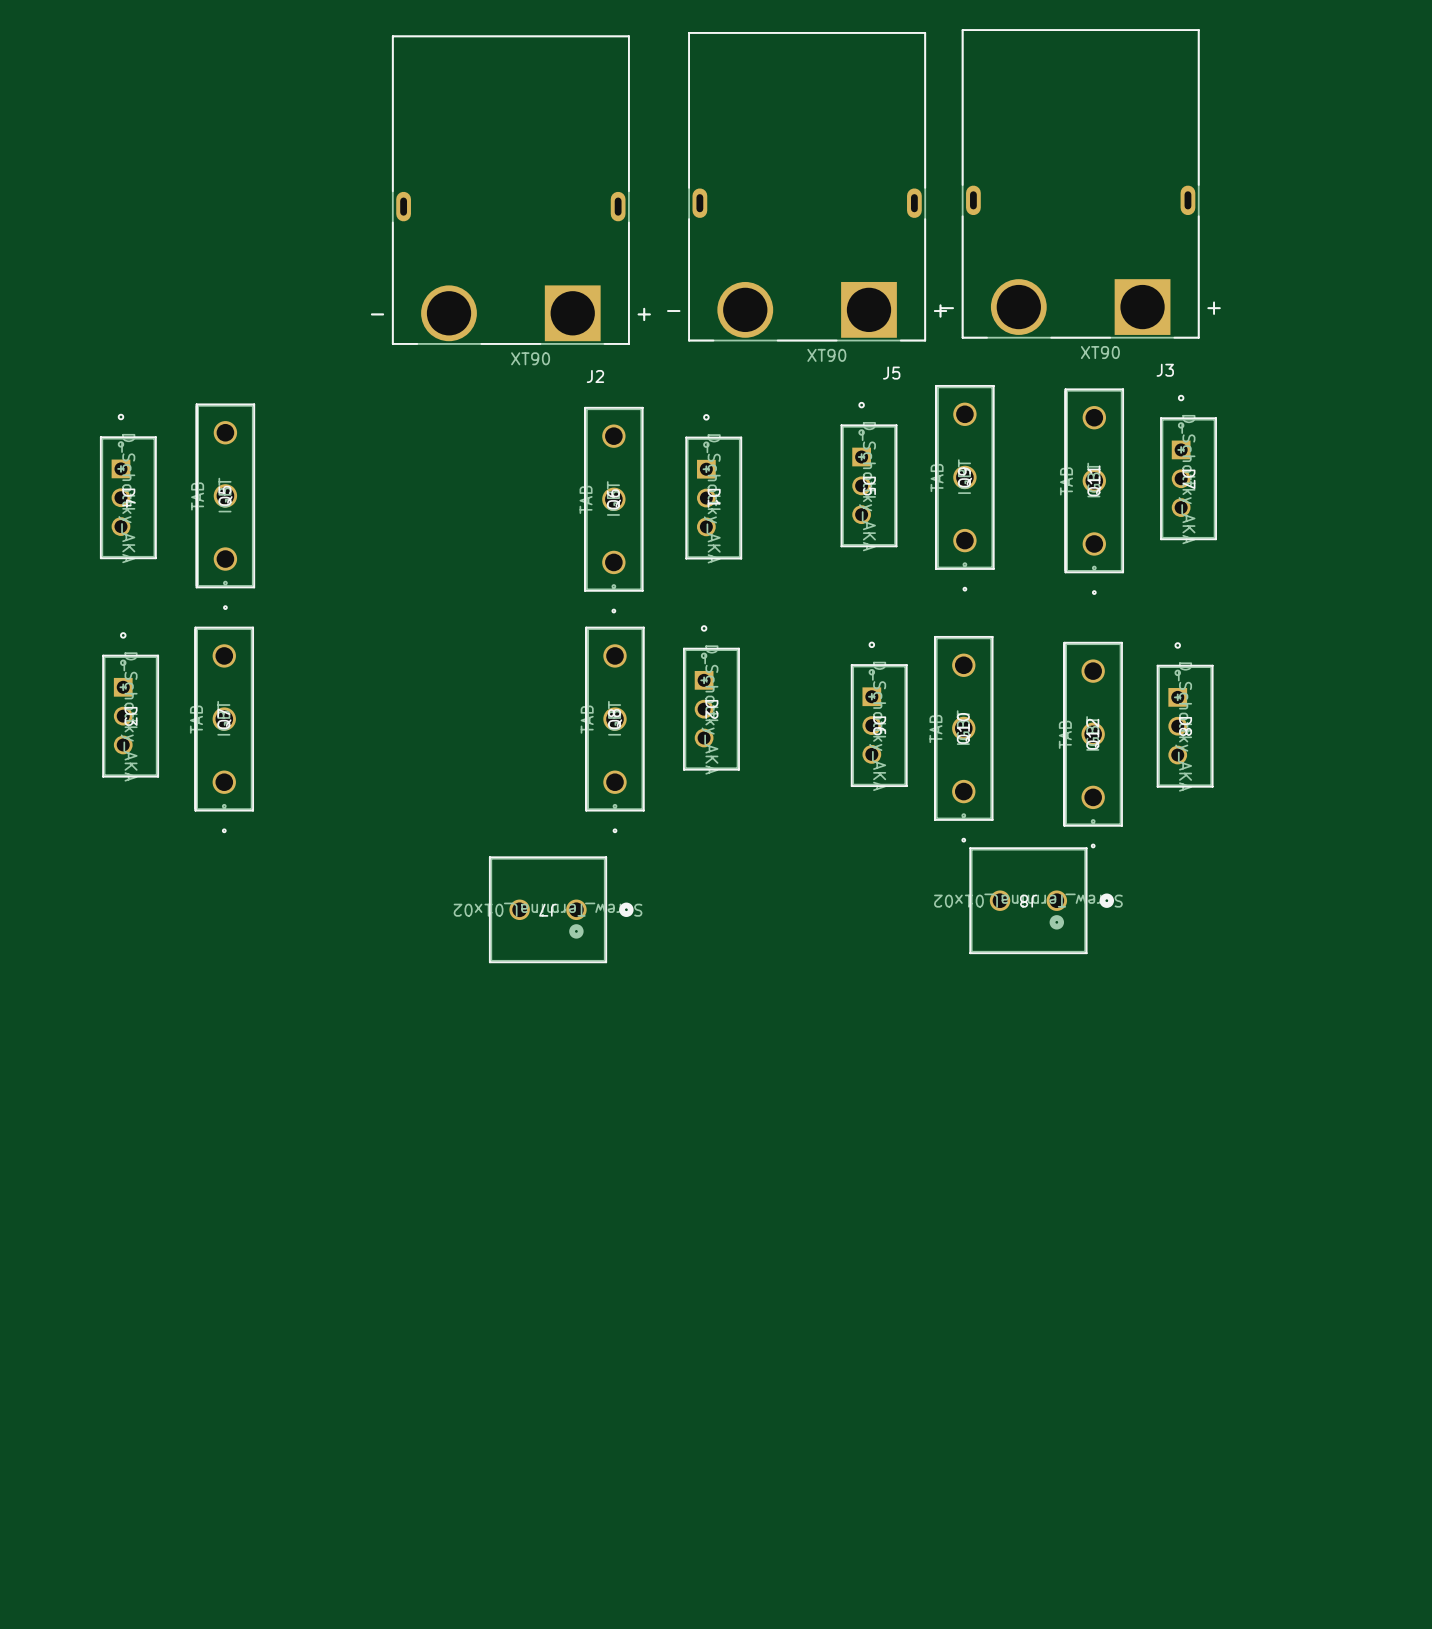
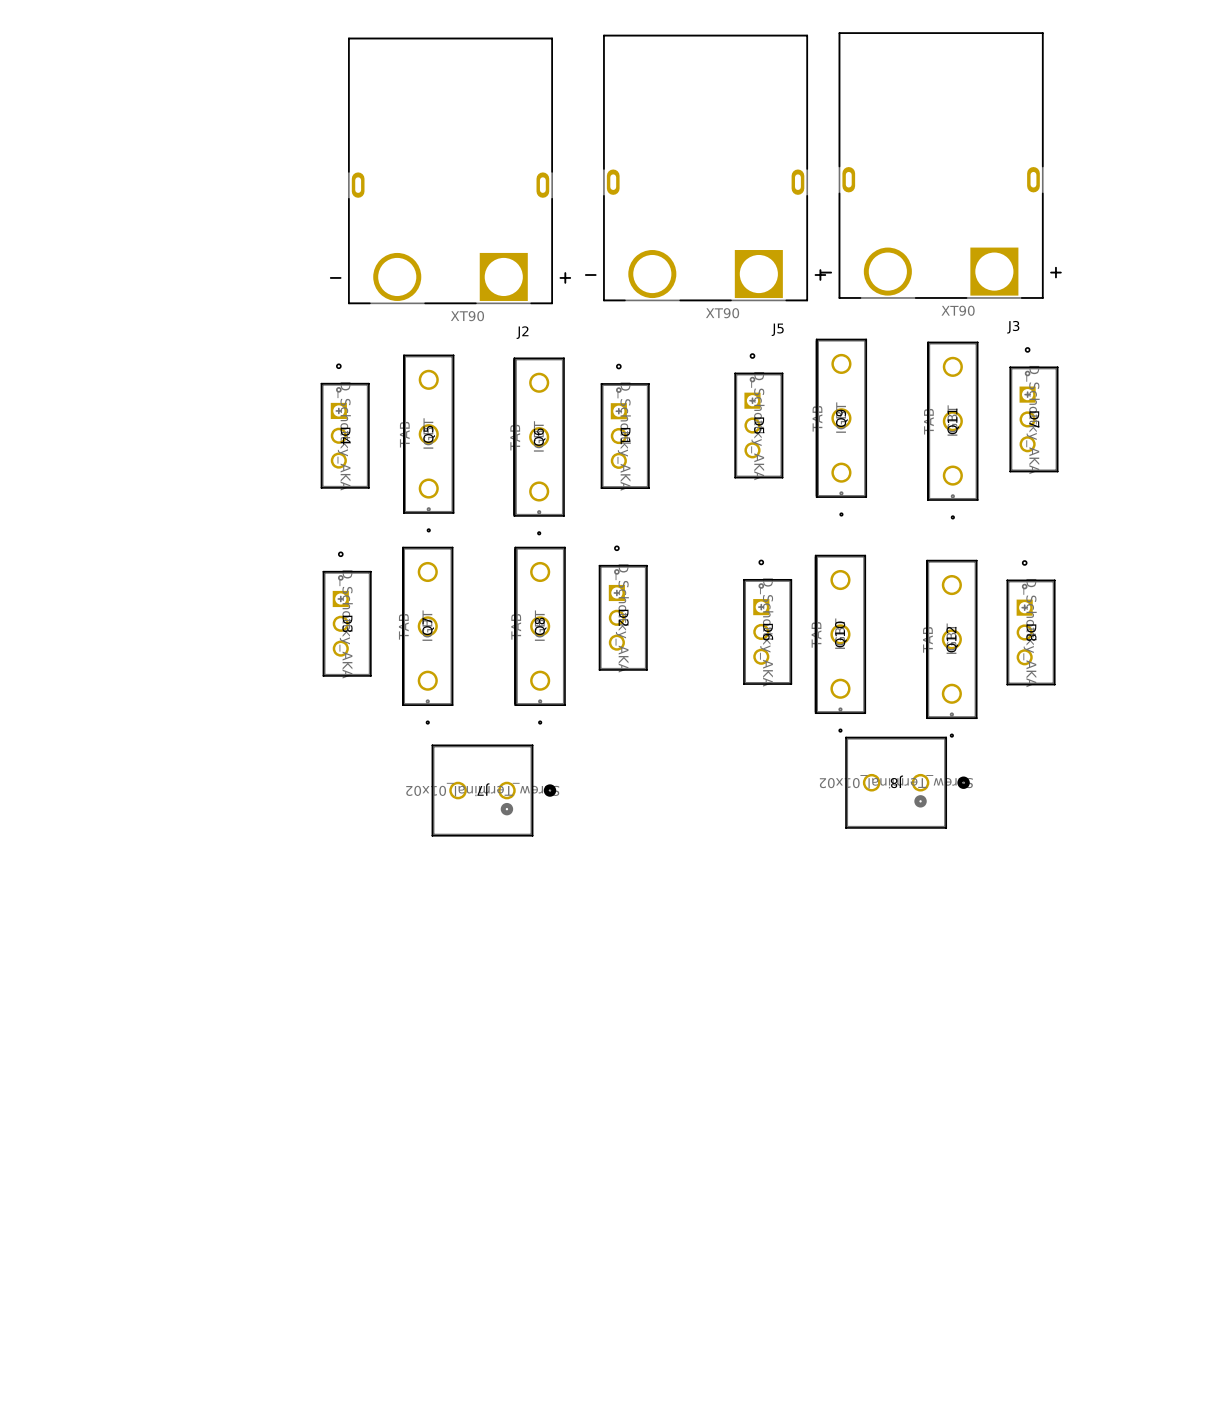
D4 position: (128, 486) -> (345, 426)
Q5 position: (225, 506) -> (428, 443)
D3 position: (130, 704) -> (347, 614)
Q7 position: (224, 729) -> (427, 635)

